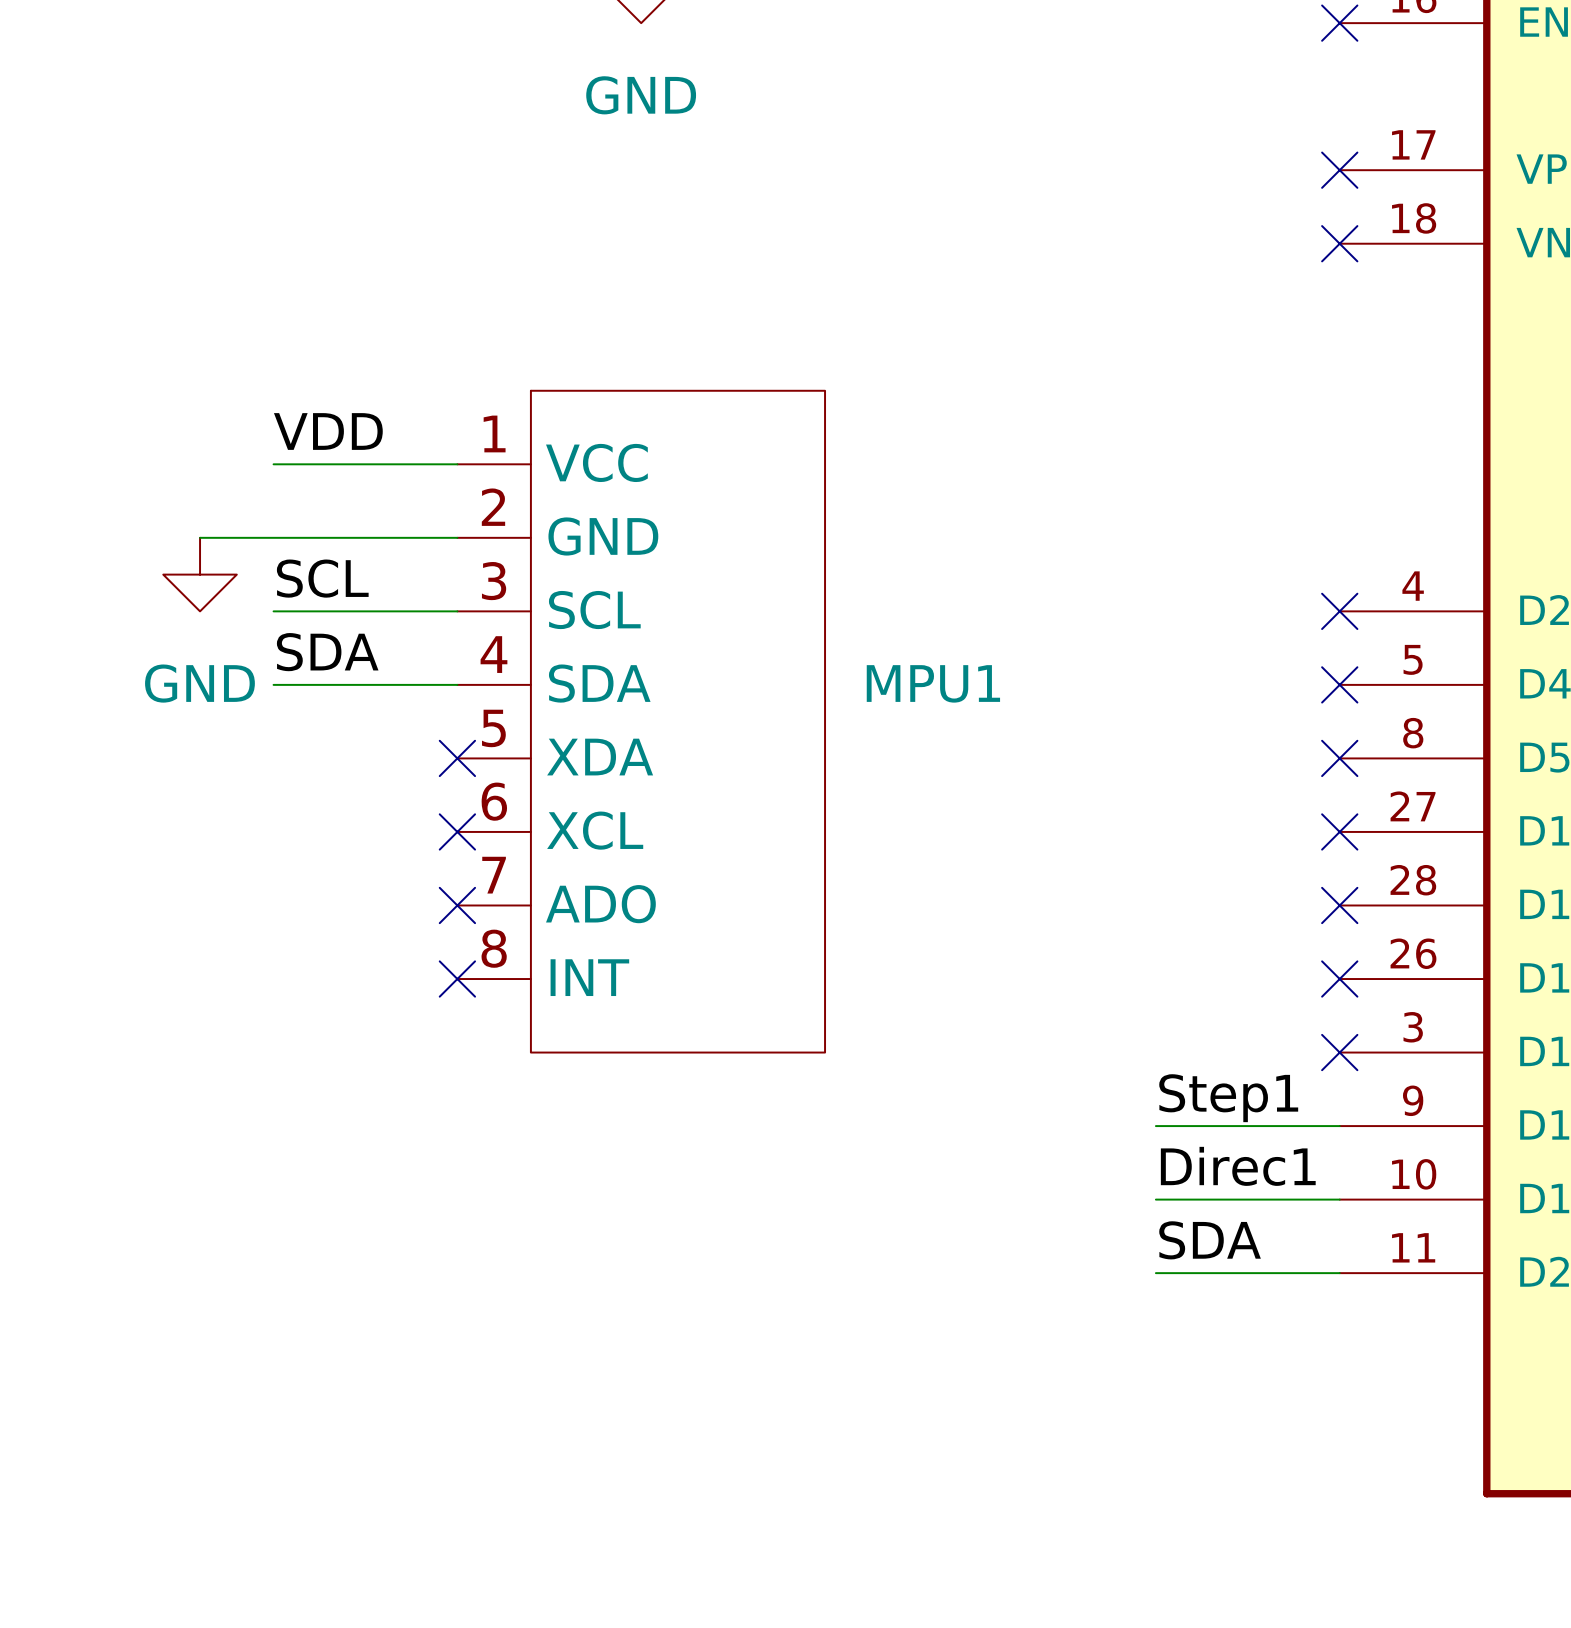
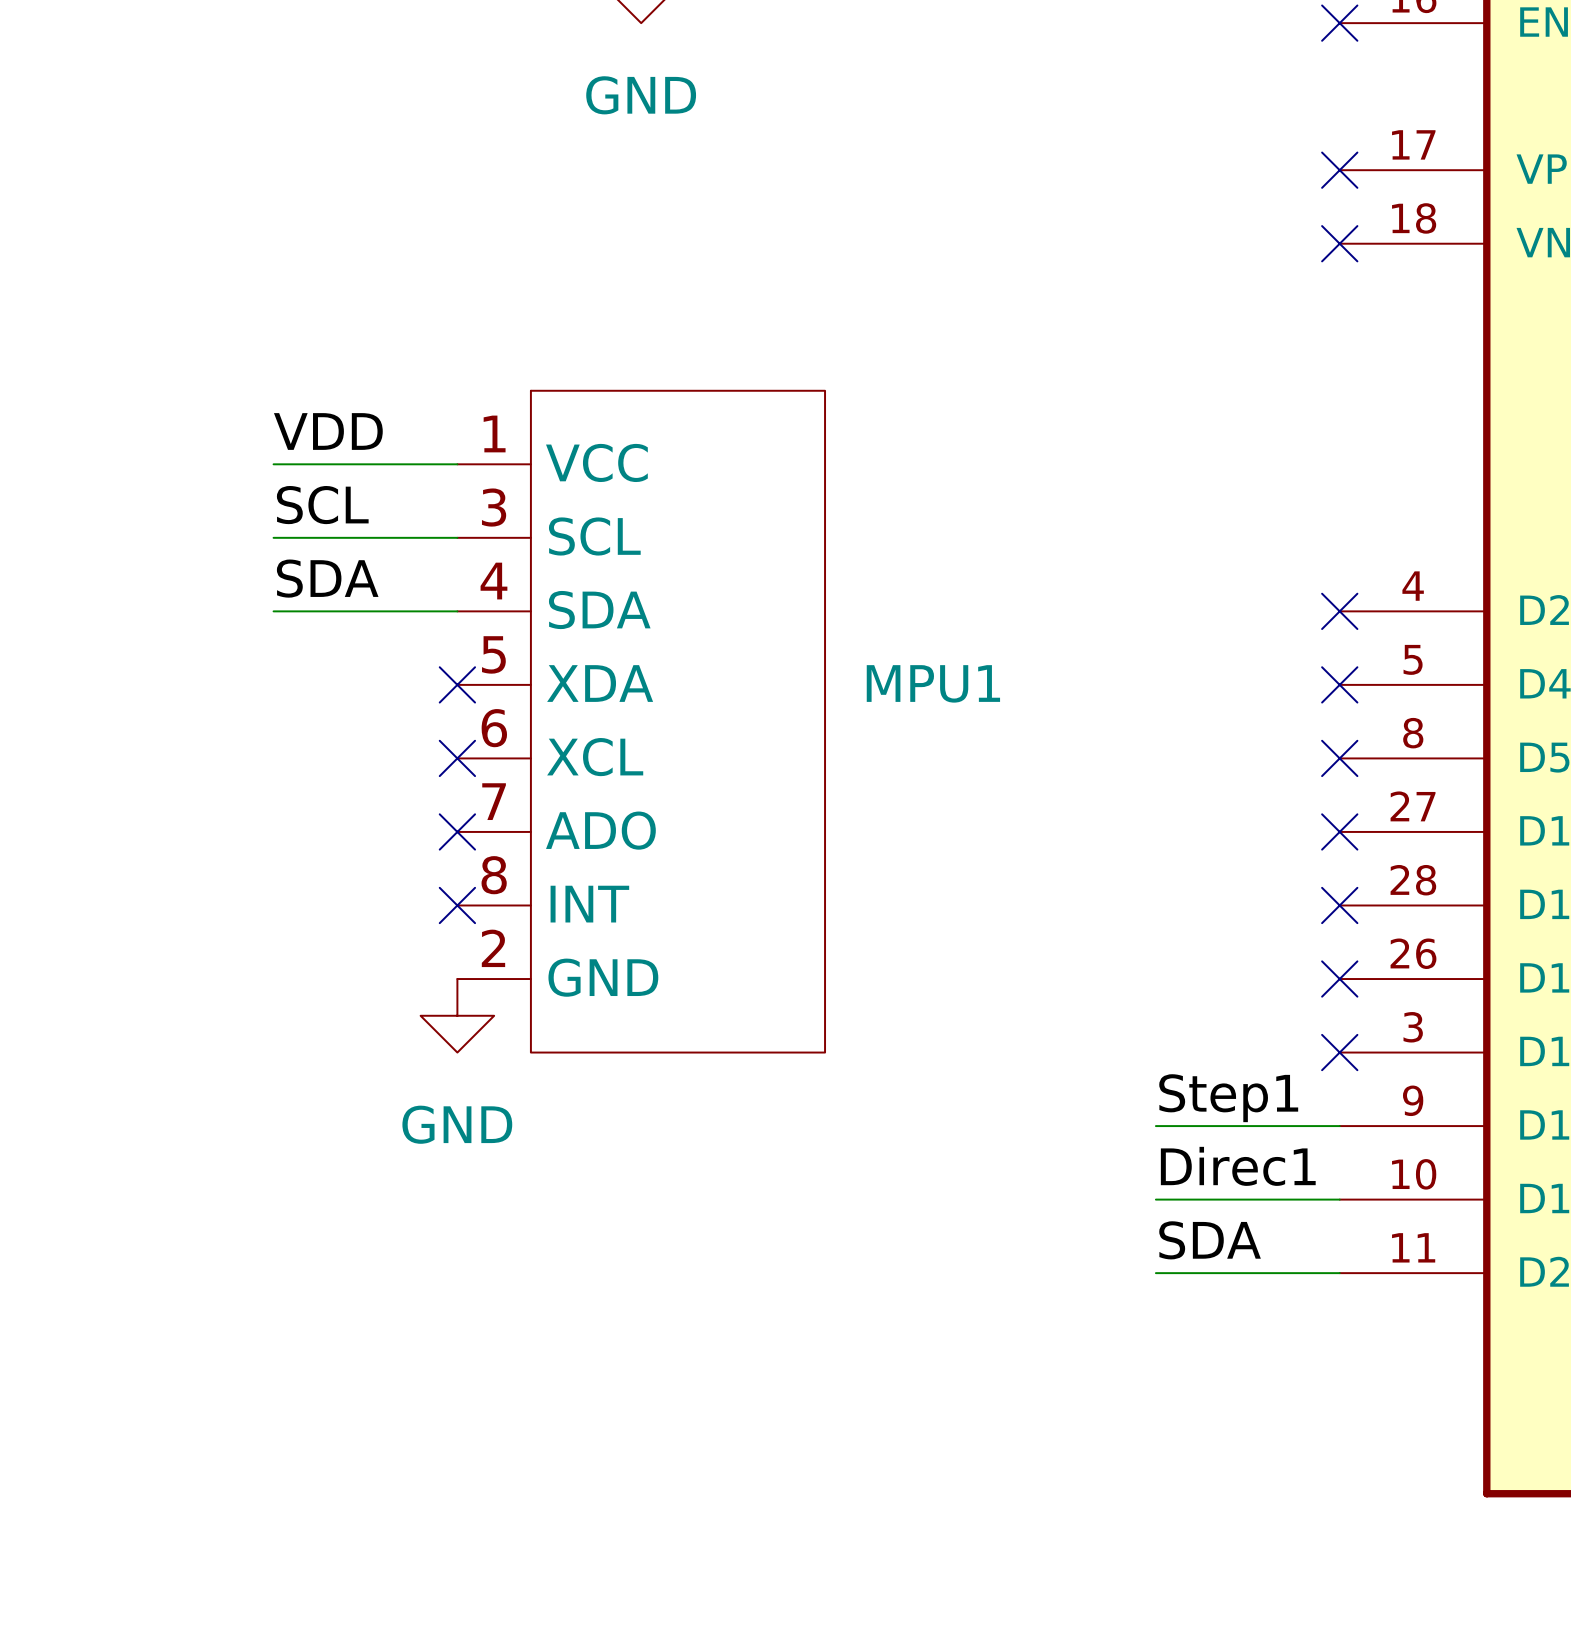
MPU1 symbol: [457, 390, 826, 1053] -> [457, 390, 826, 1053]
label: none -> SCL (322, 505)
wire: (200, 537) (273, 537) -> none
power symbol position: GND (200, 574) -> GND (457, 1015)
label: SCL (322, 578) -> SDA (327, 578)
label: SDA (327, 652) -> none
wire: (273, 684) (457, 684) -> none
no-connect mark: none -> (457, 684)
no-connect mark: (457, 979) -> none

